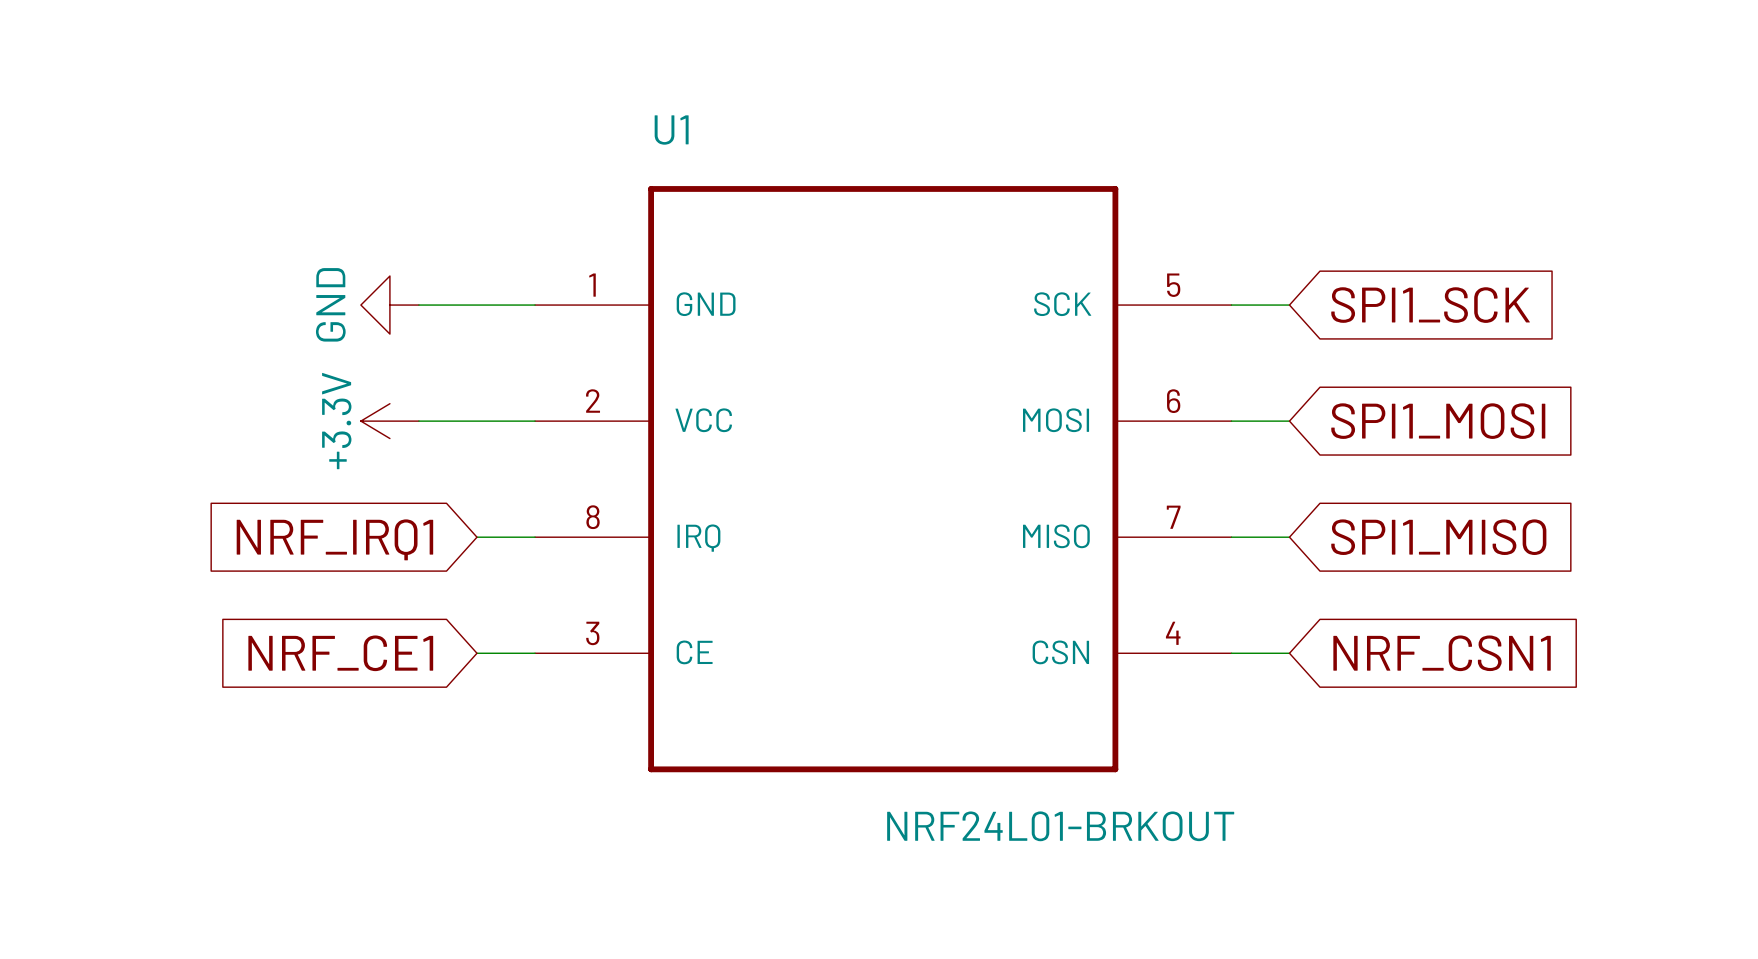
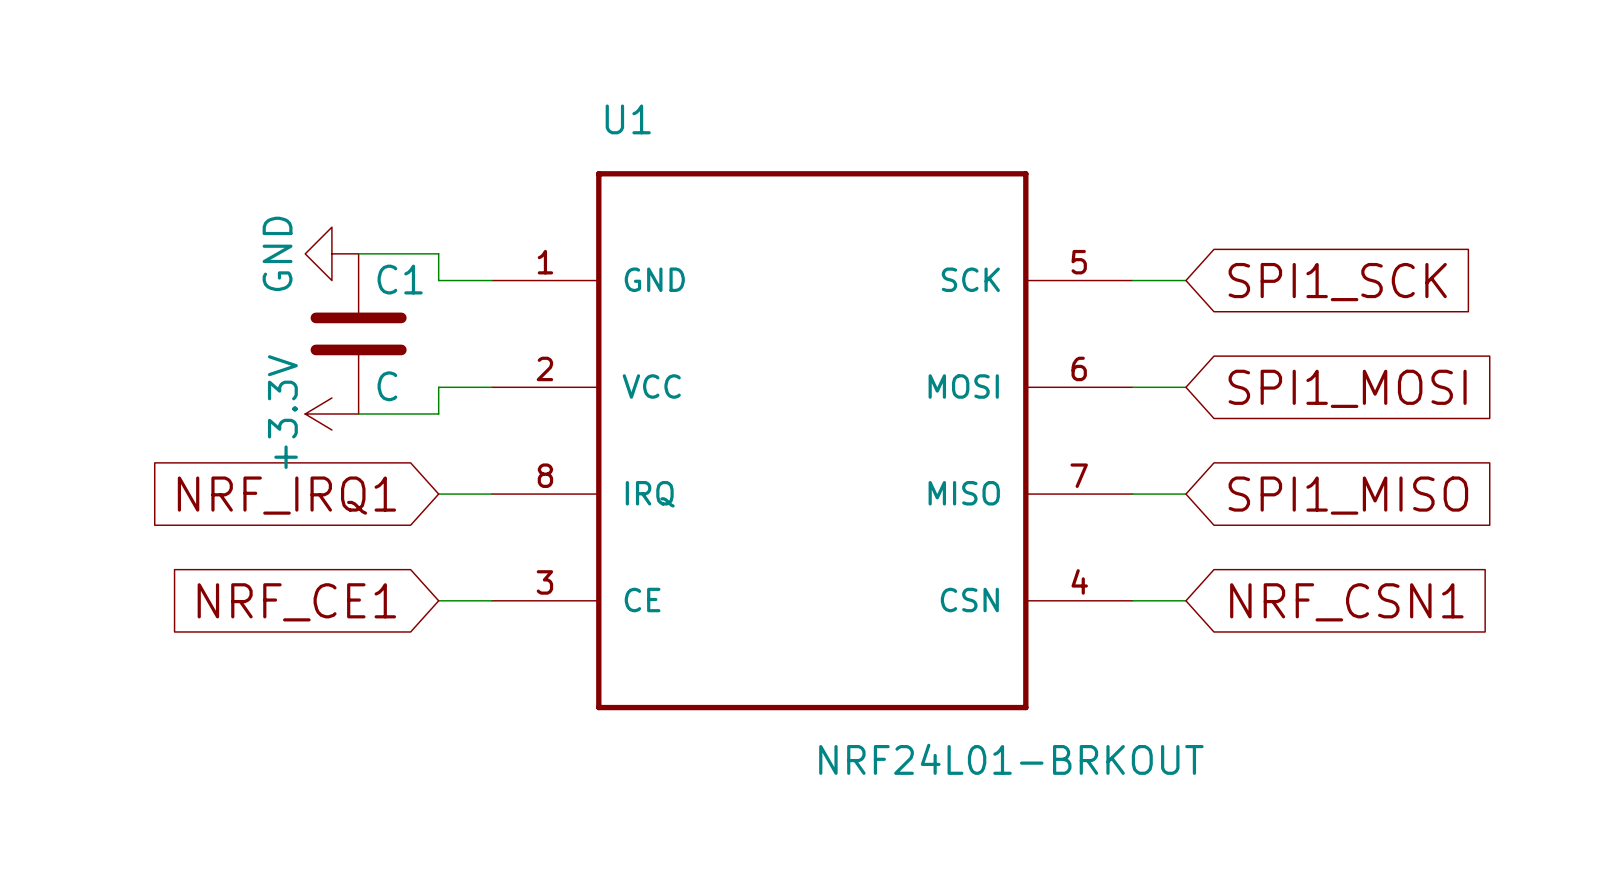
power symbol position: GND (389, 305) -> GND (331, 253)
wire: (418, 305) (476, 305) -> (358, 253) (438, 253) (438, 280)
C1: none -> C (358, 333)
power symbol position: +3.3V (389, 421) -> +3.3V (331, 413)
wire: (418, 421) (476, 421) -> (358, 413) (438, 413) (438, 387)

